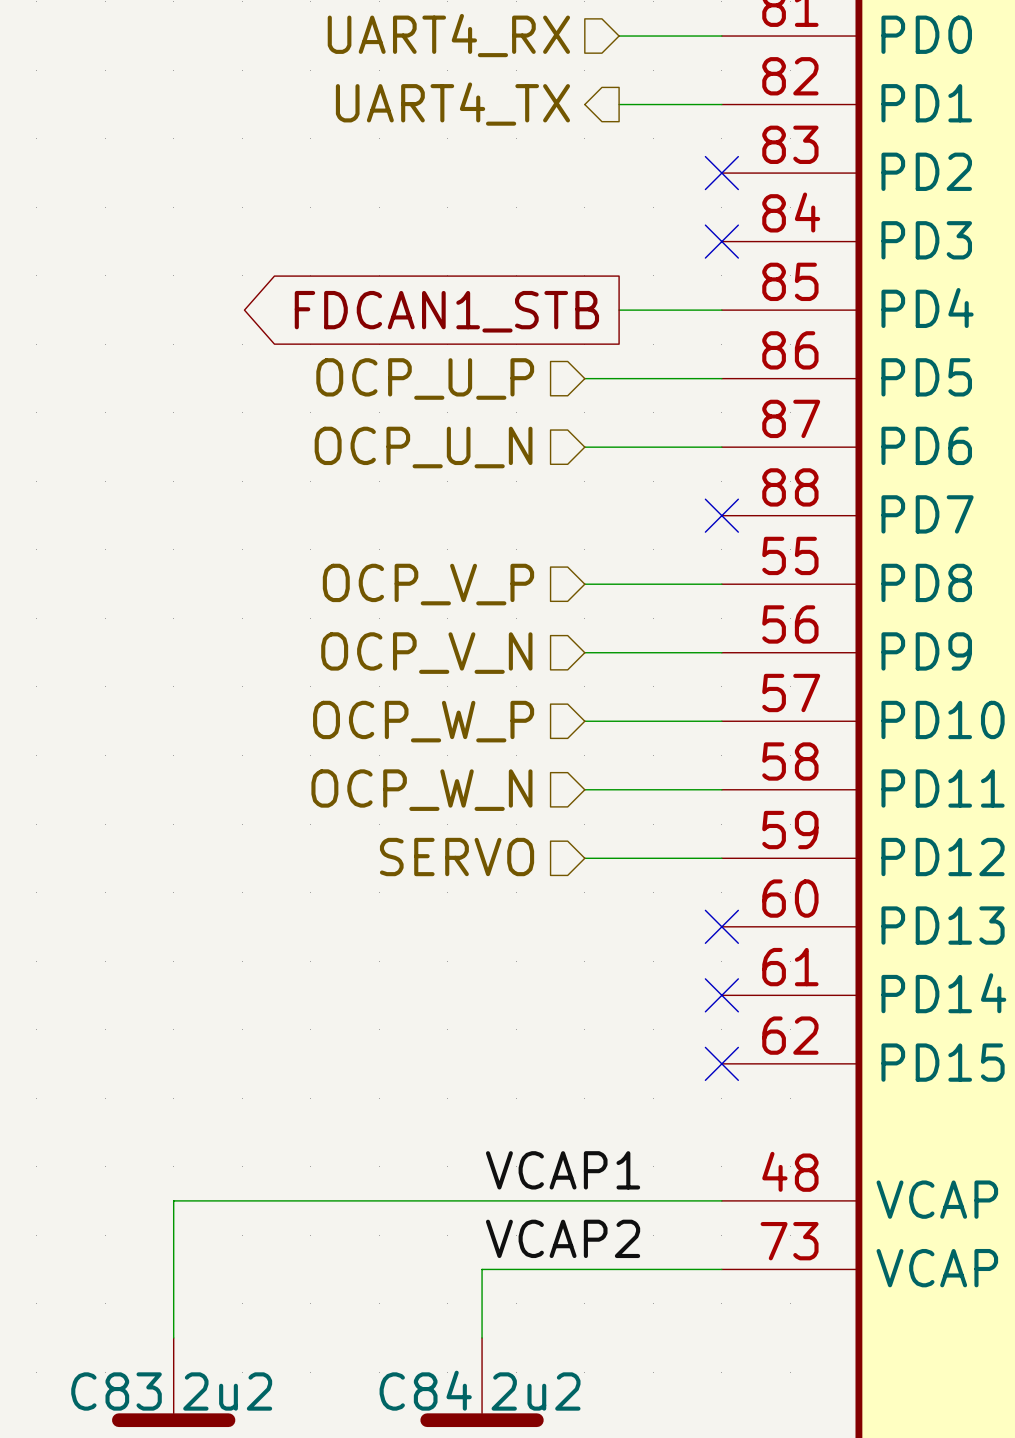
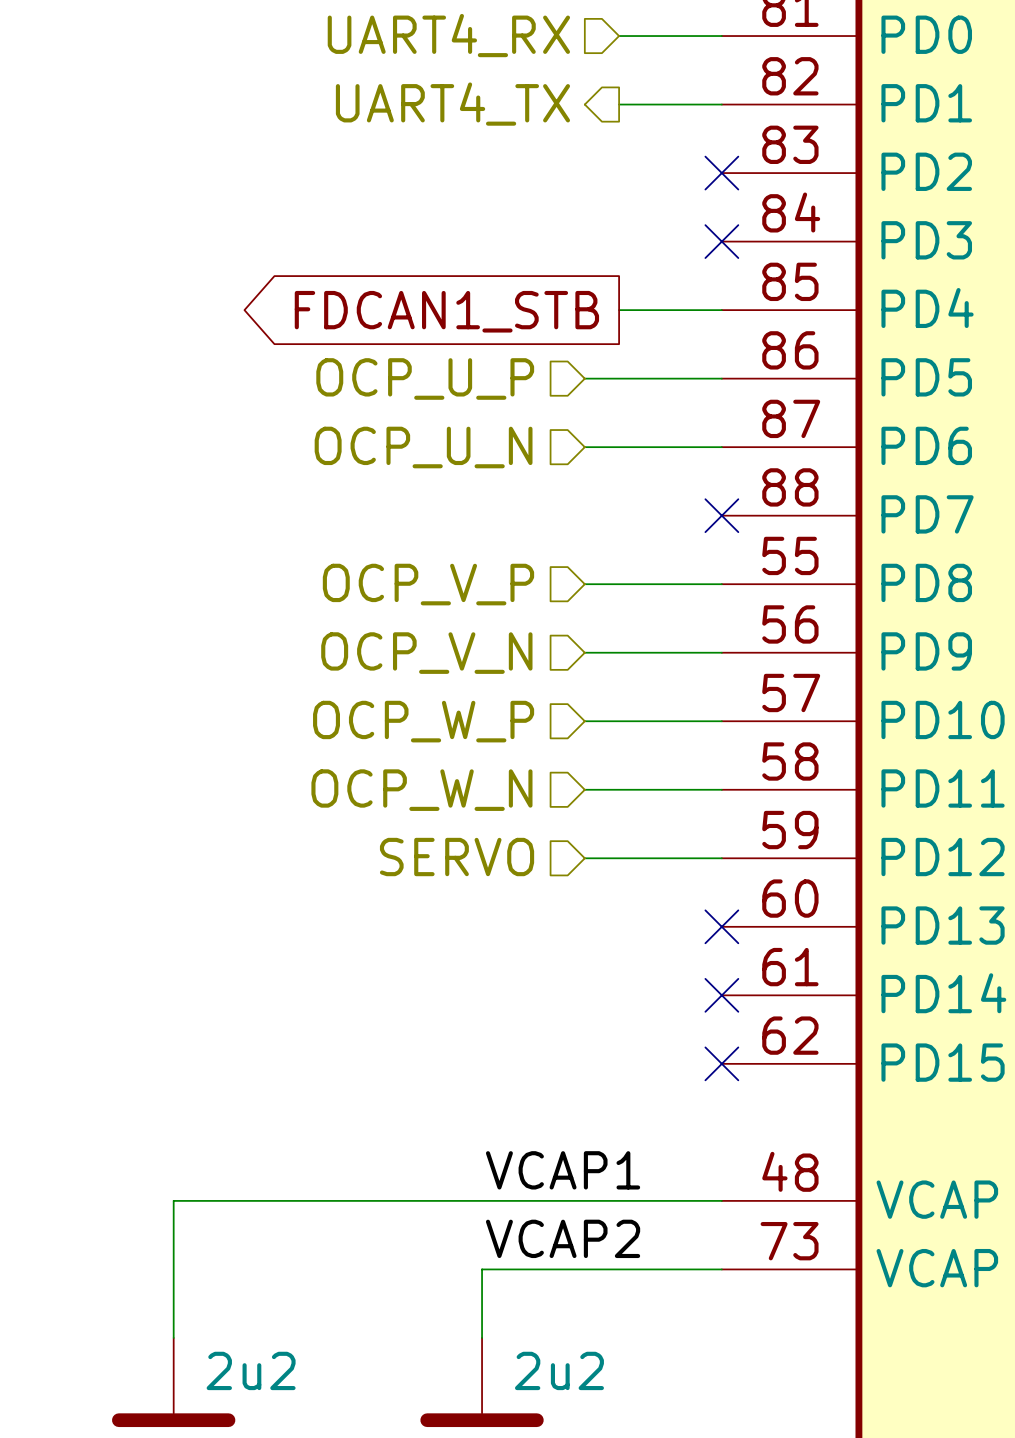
C83 value: none -> 2u2 (251, 1370)
C84 value: none -> 2u2 (559, 1370)
C84 name: C84 (425, 1390) -> none
C83 name: C83 (116, 1391) -> none
C83 text: 2u2 (227, 1391) -> none
C84 text: 2u2 (536, 1391) -> none

